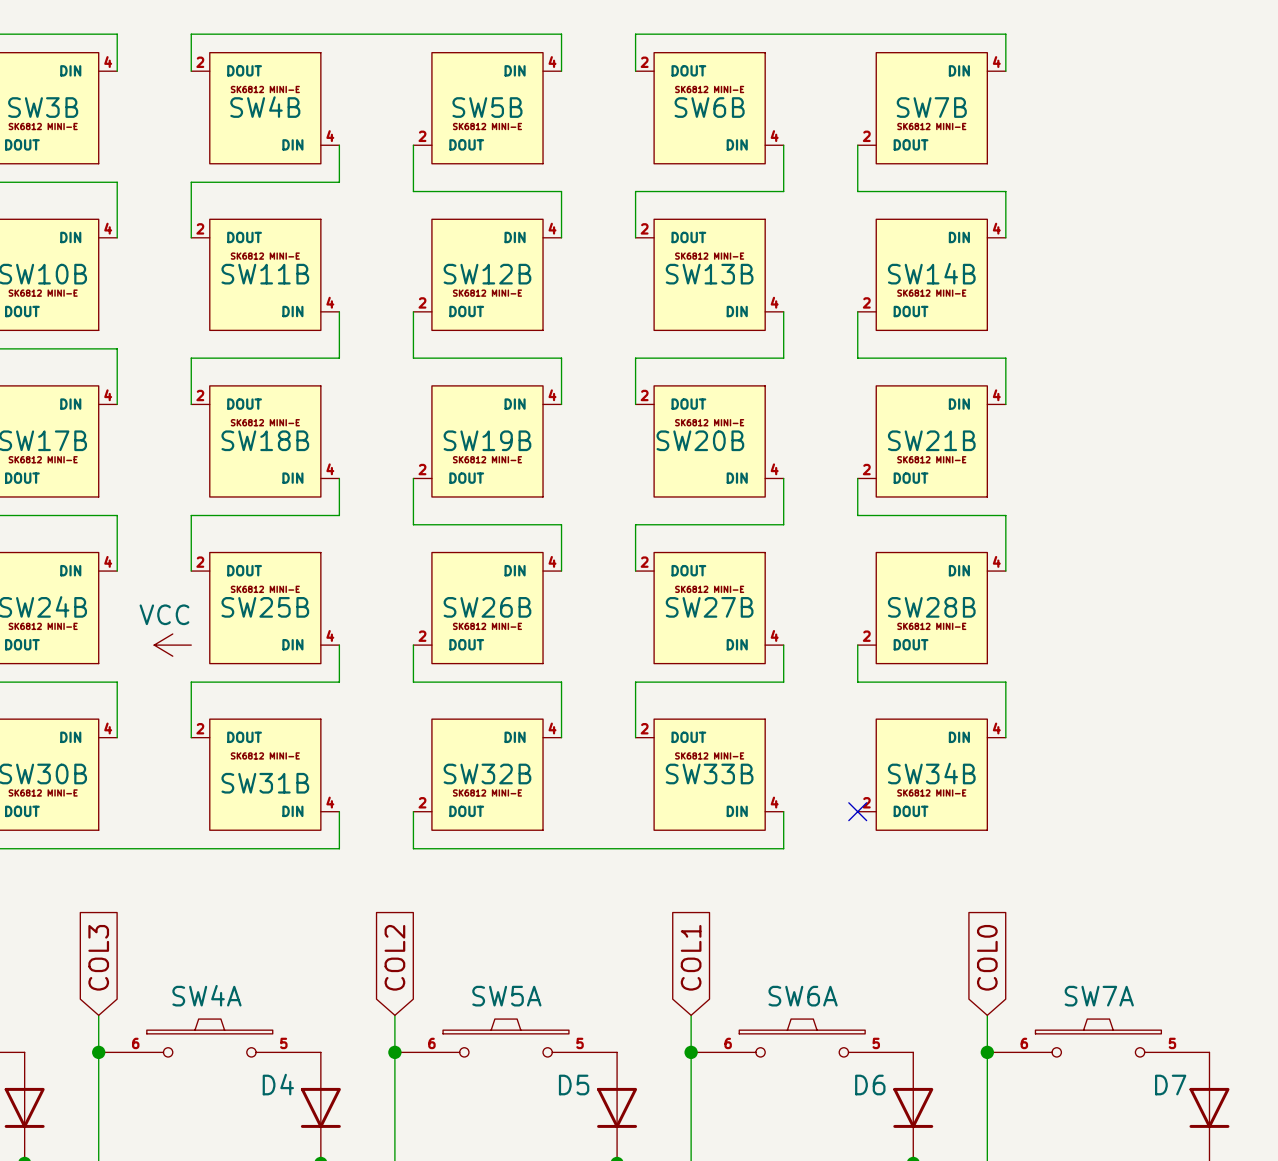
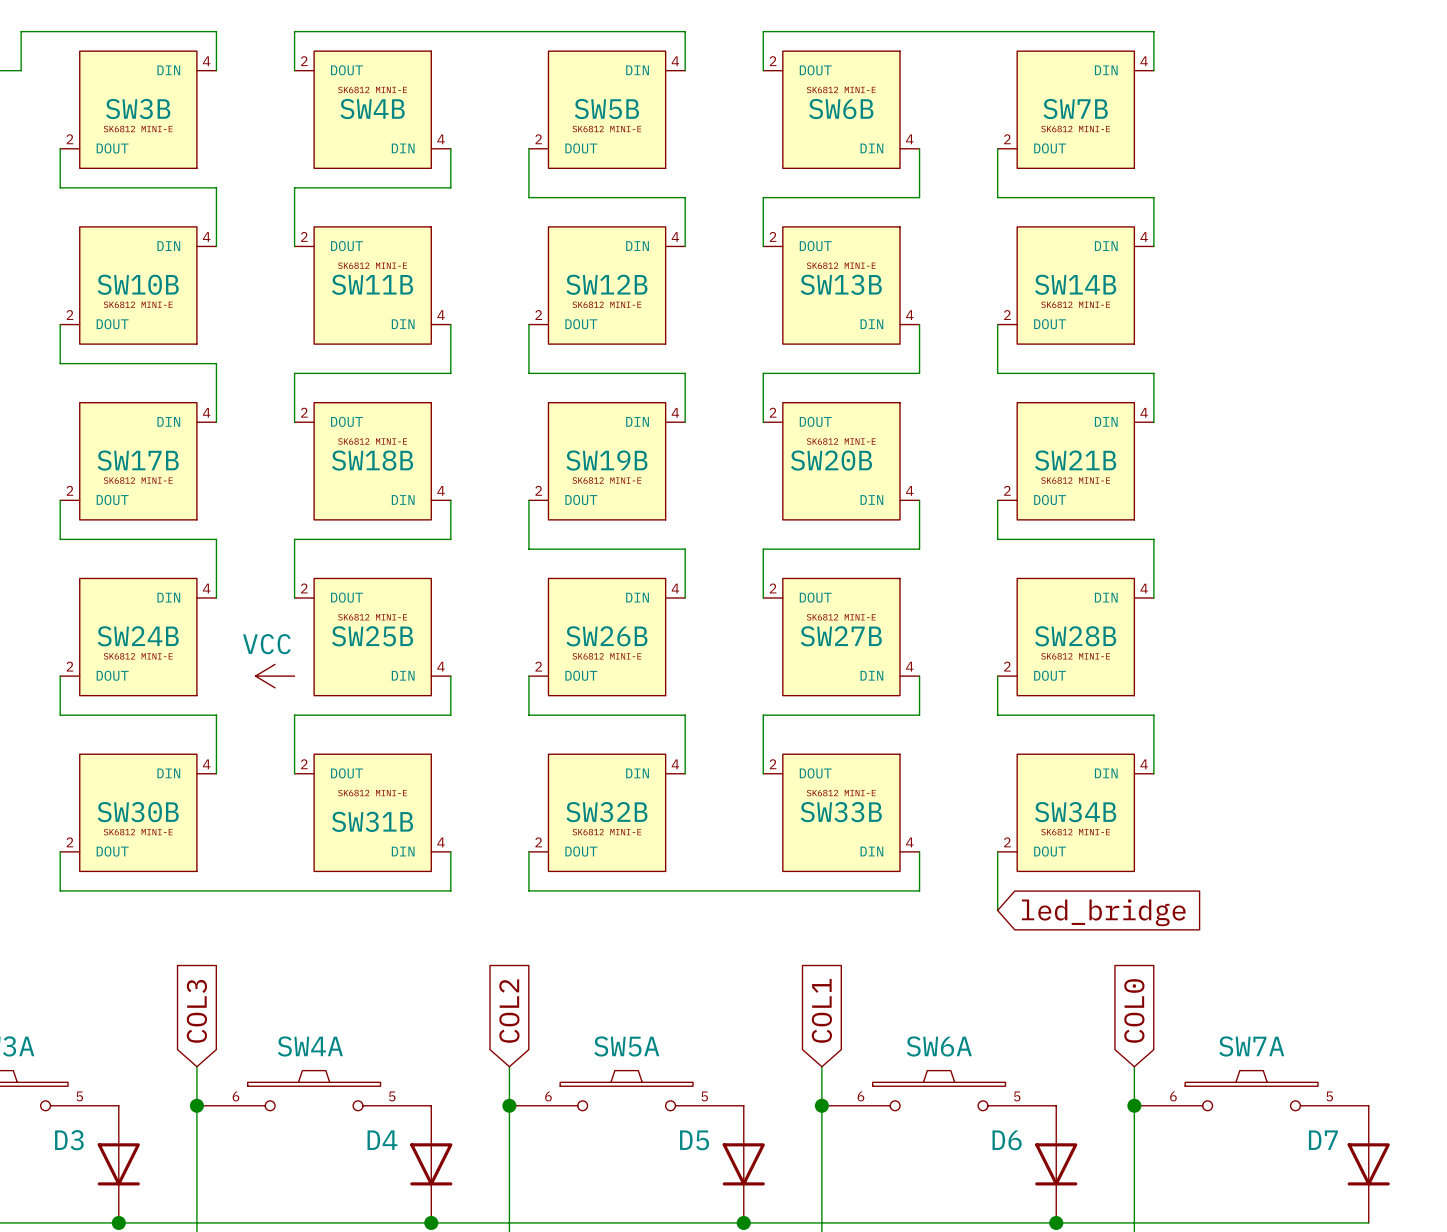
wire: none -> (997, 851) (997, 910)
no-connect mark: (857, 811) -> none
global label: none -> led_bridge (1103, 912)

